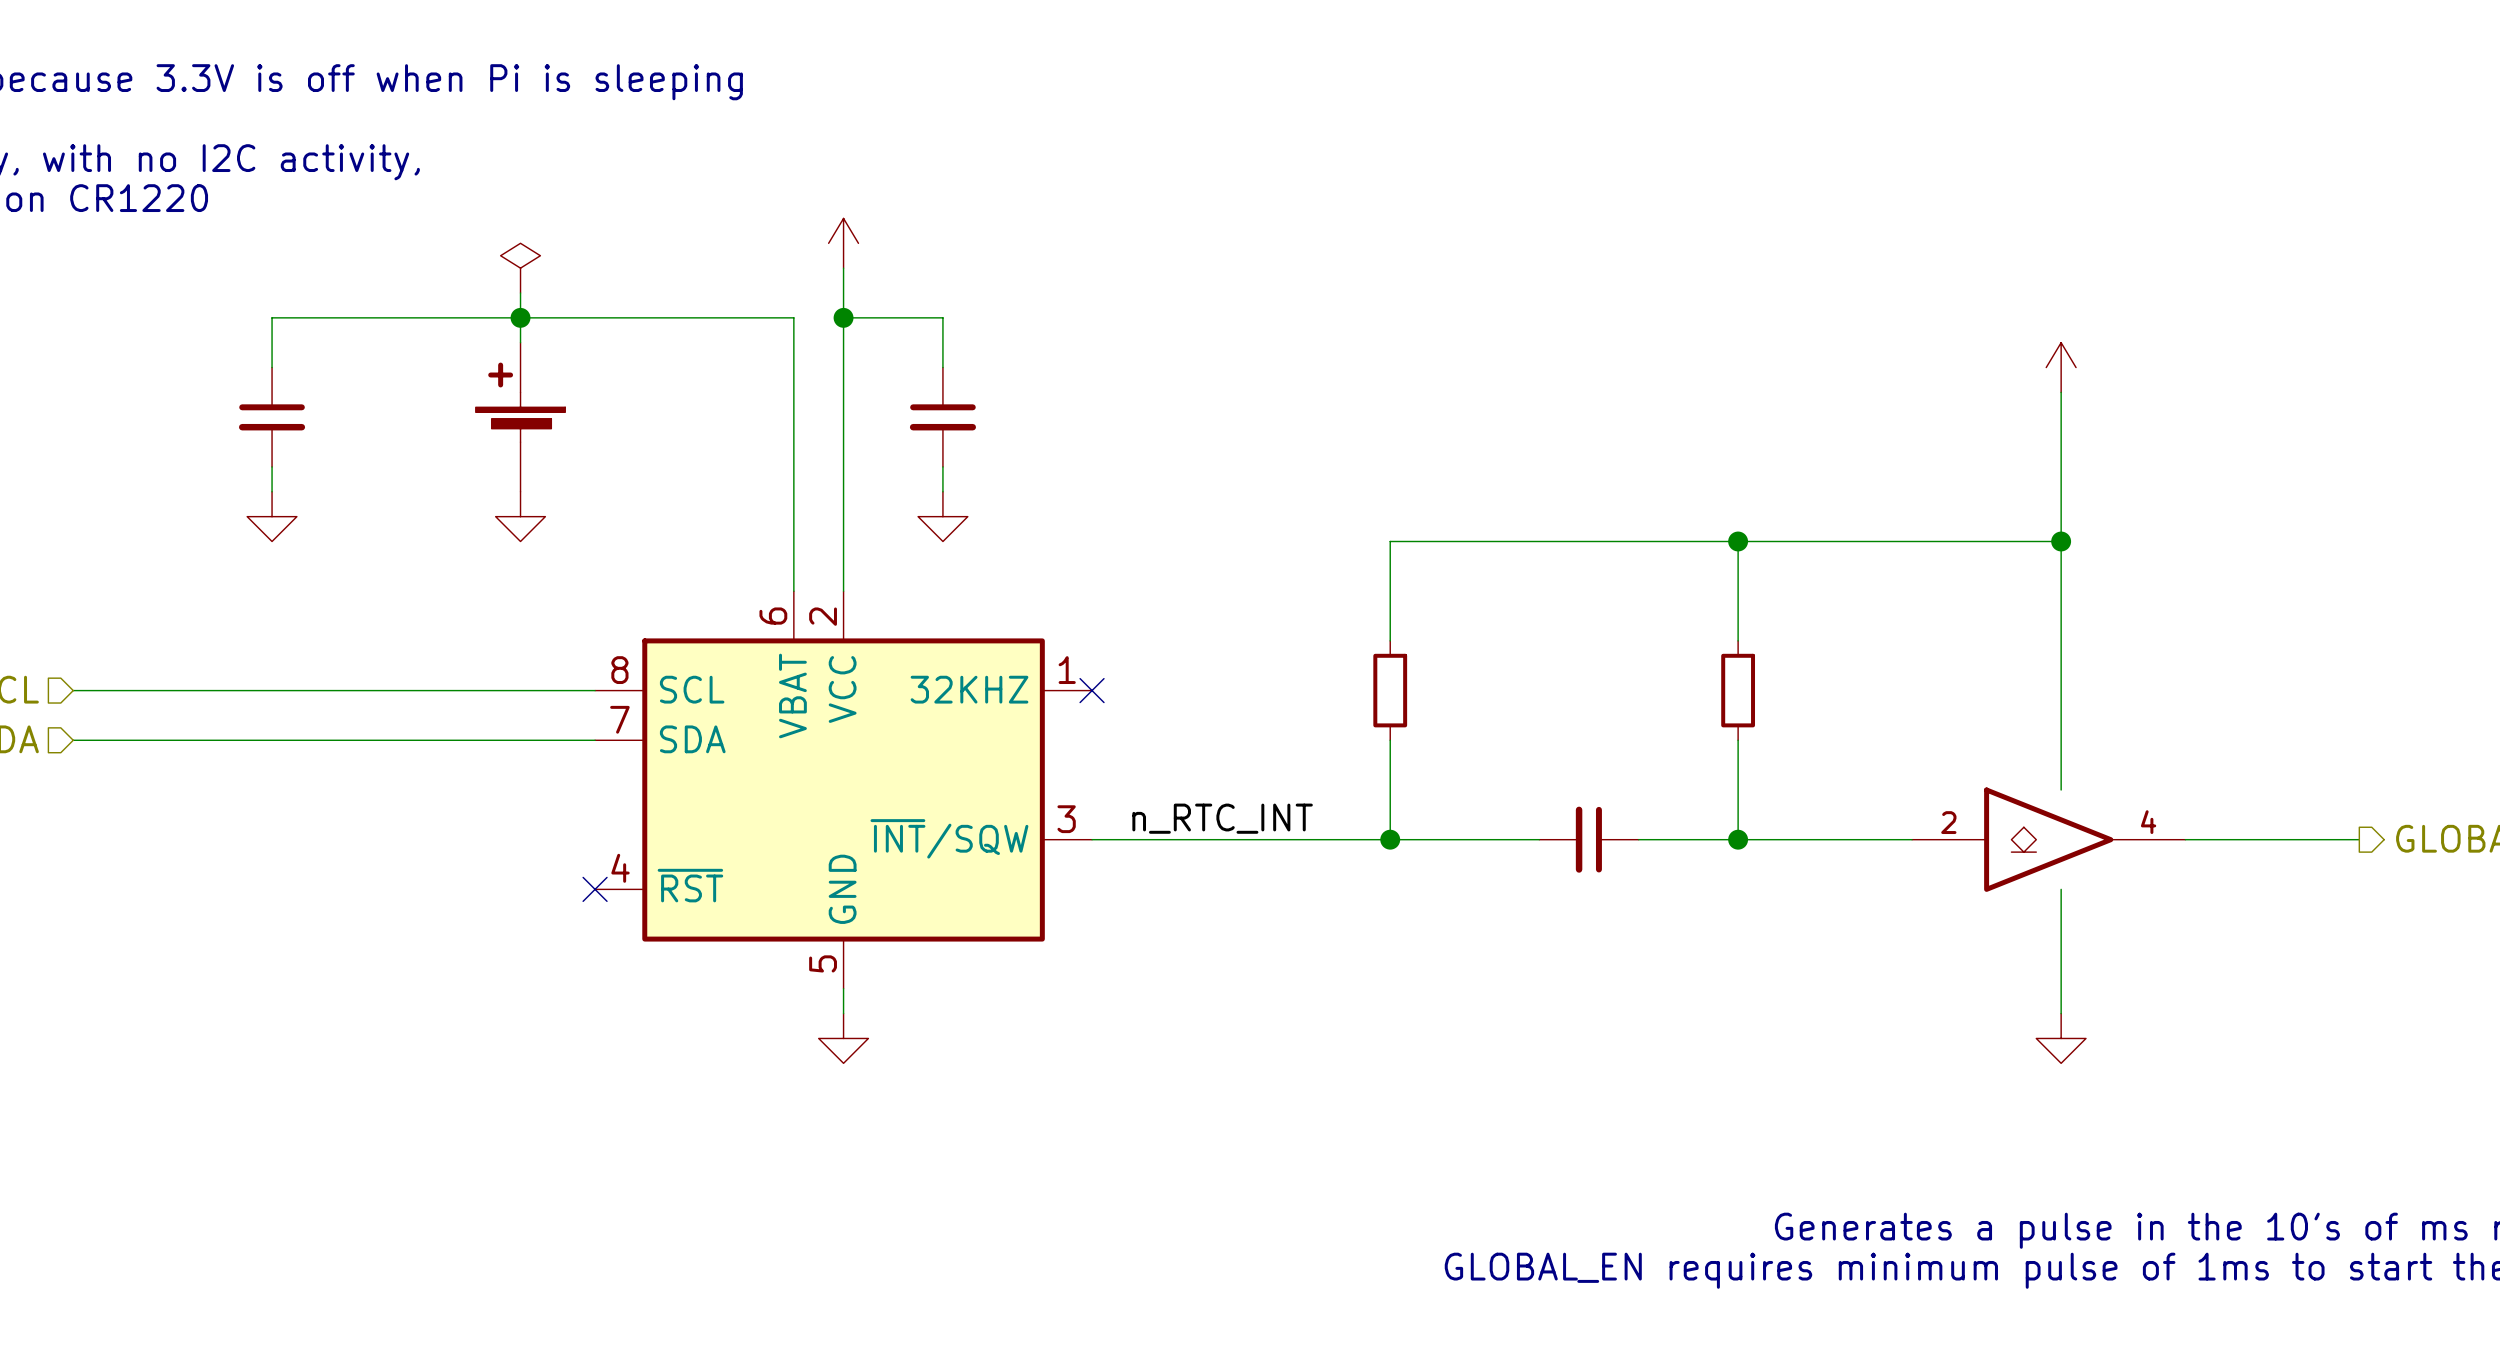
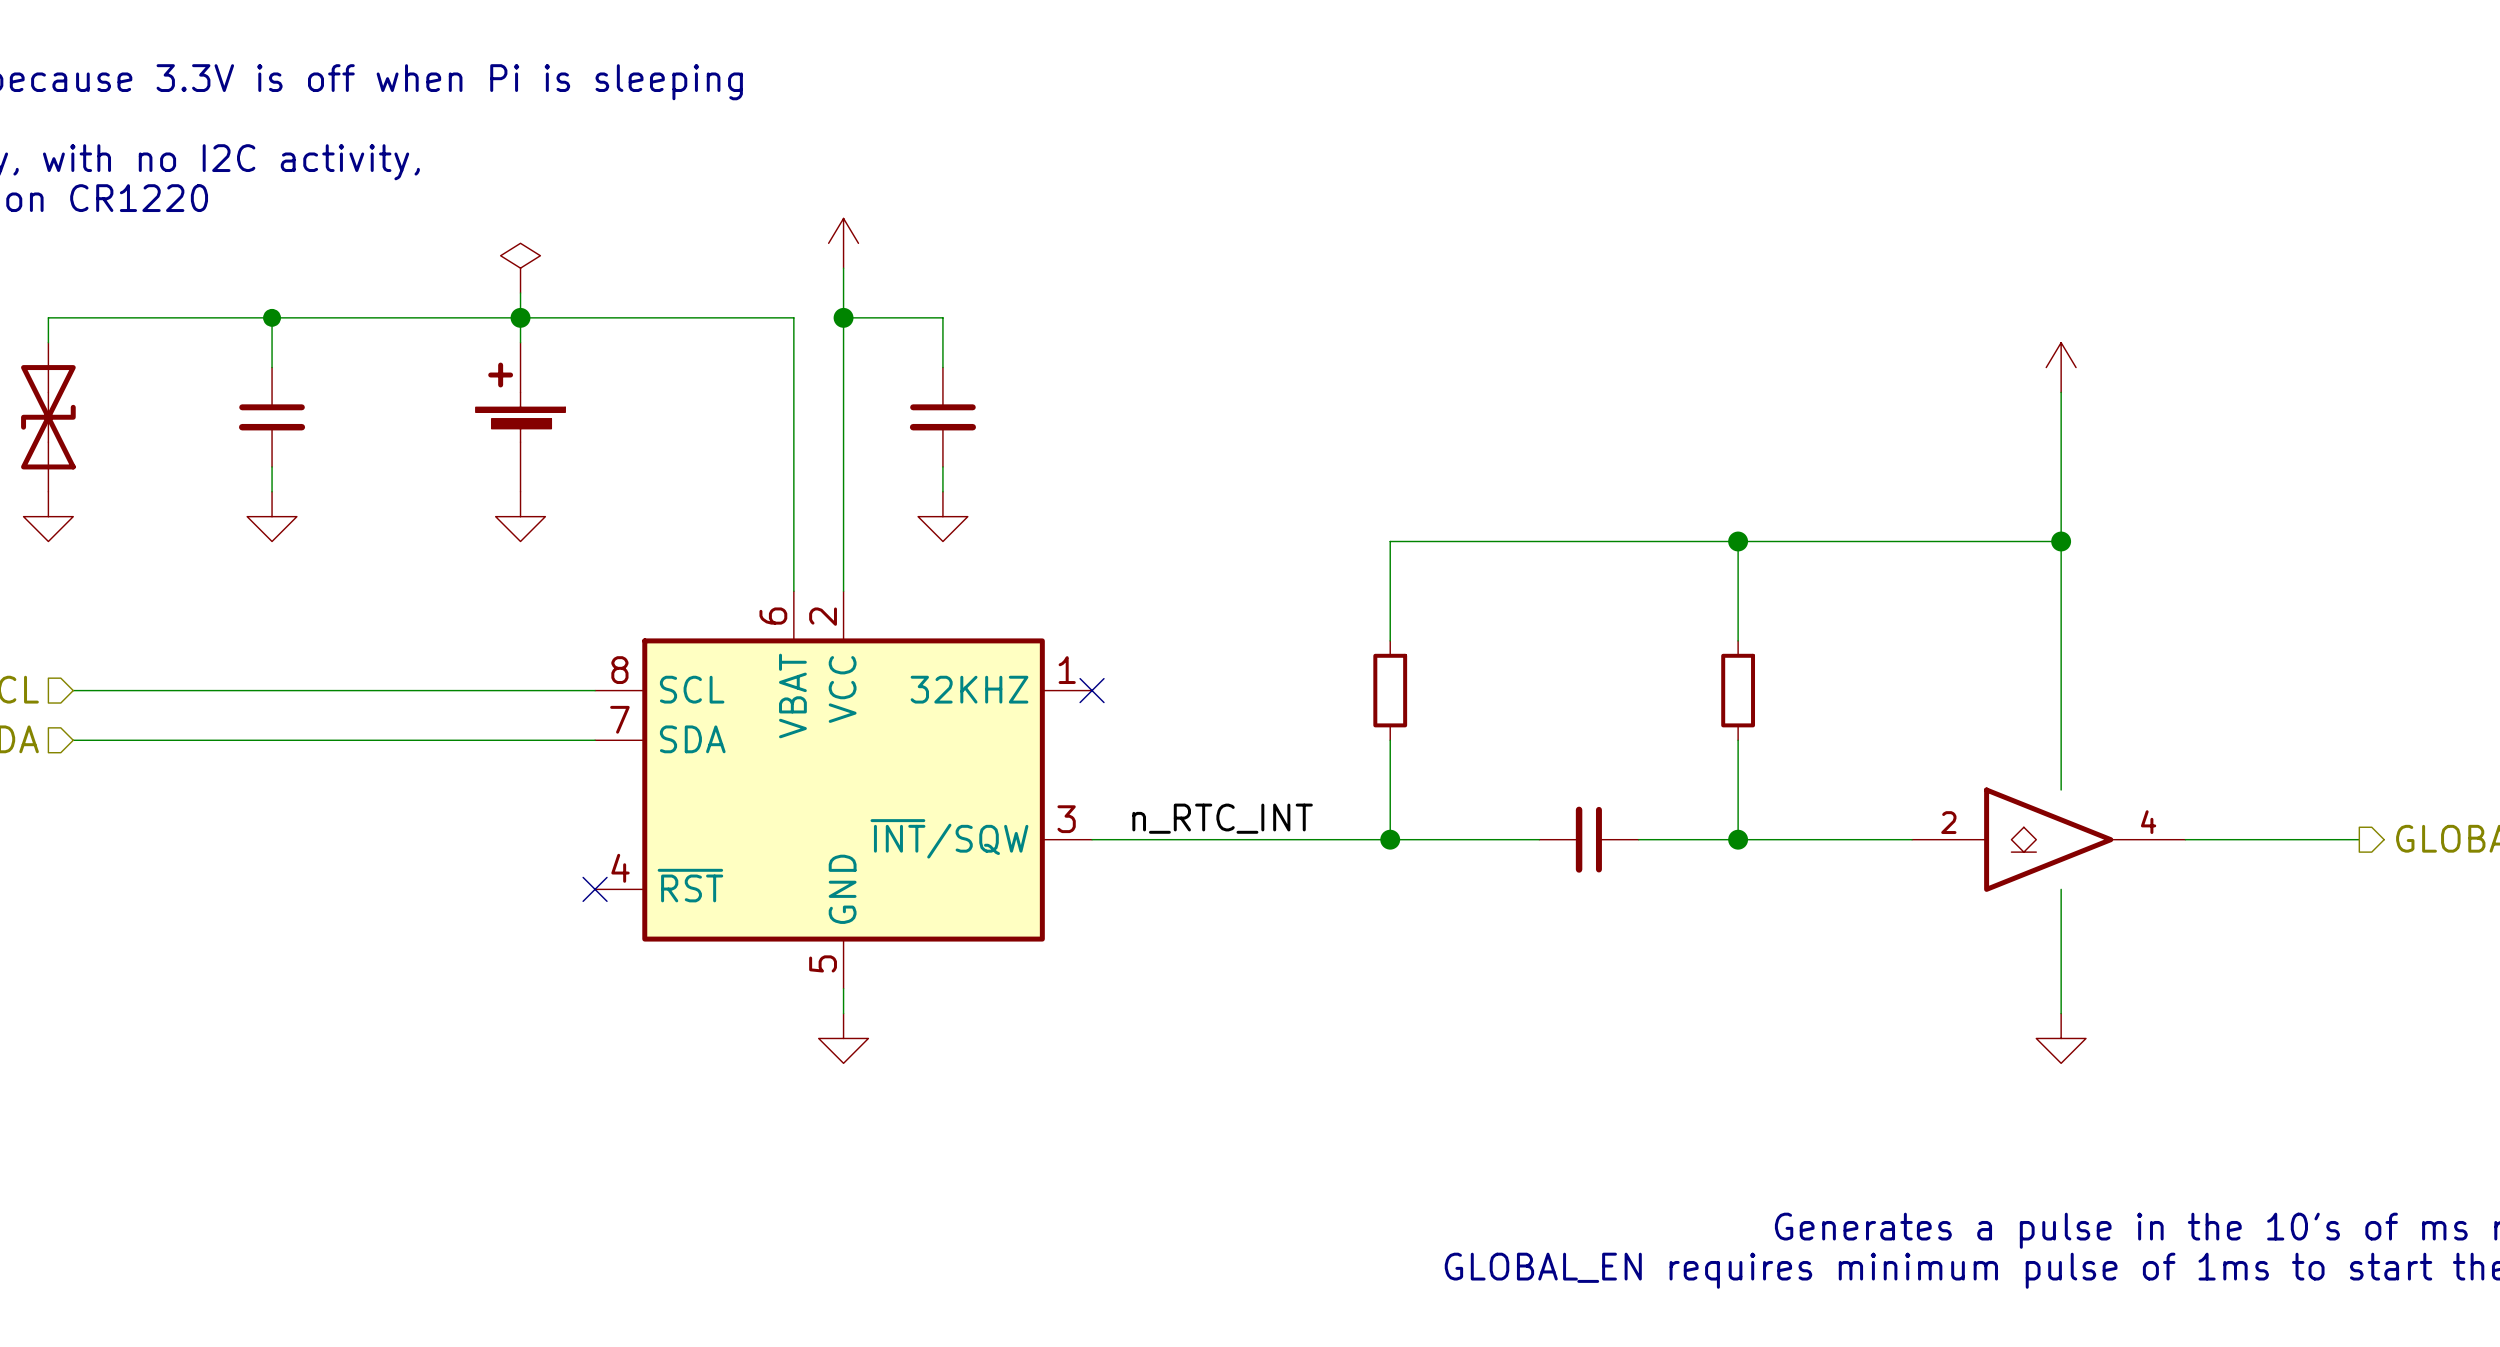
wire: none -> (272, 317) (48, 317) (48, 342)
junction: none -> (272, 317)
part: none -> (48, 417)
power symbol: none -> (48, 516)

